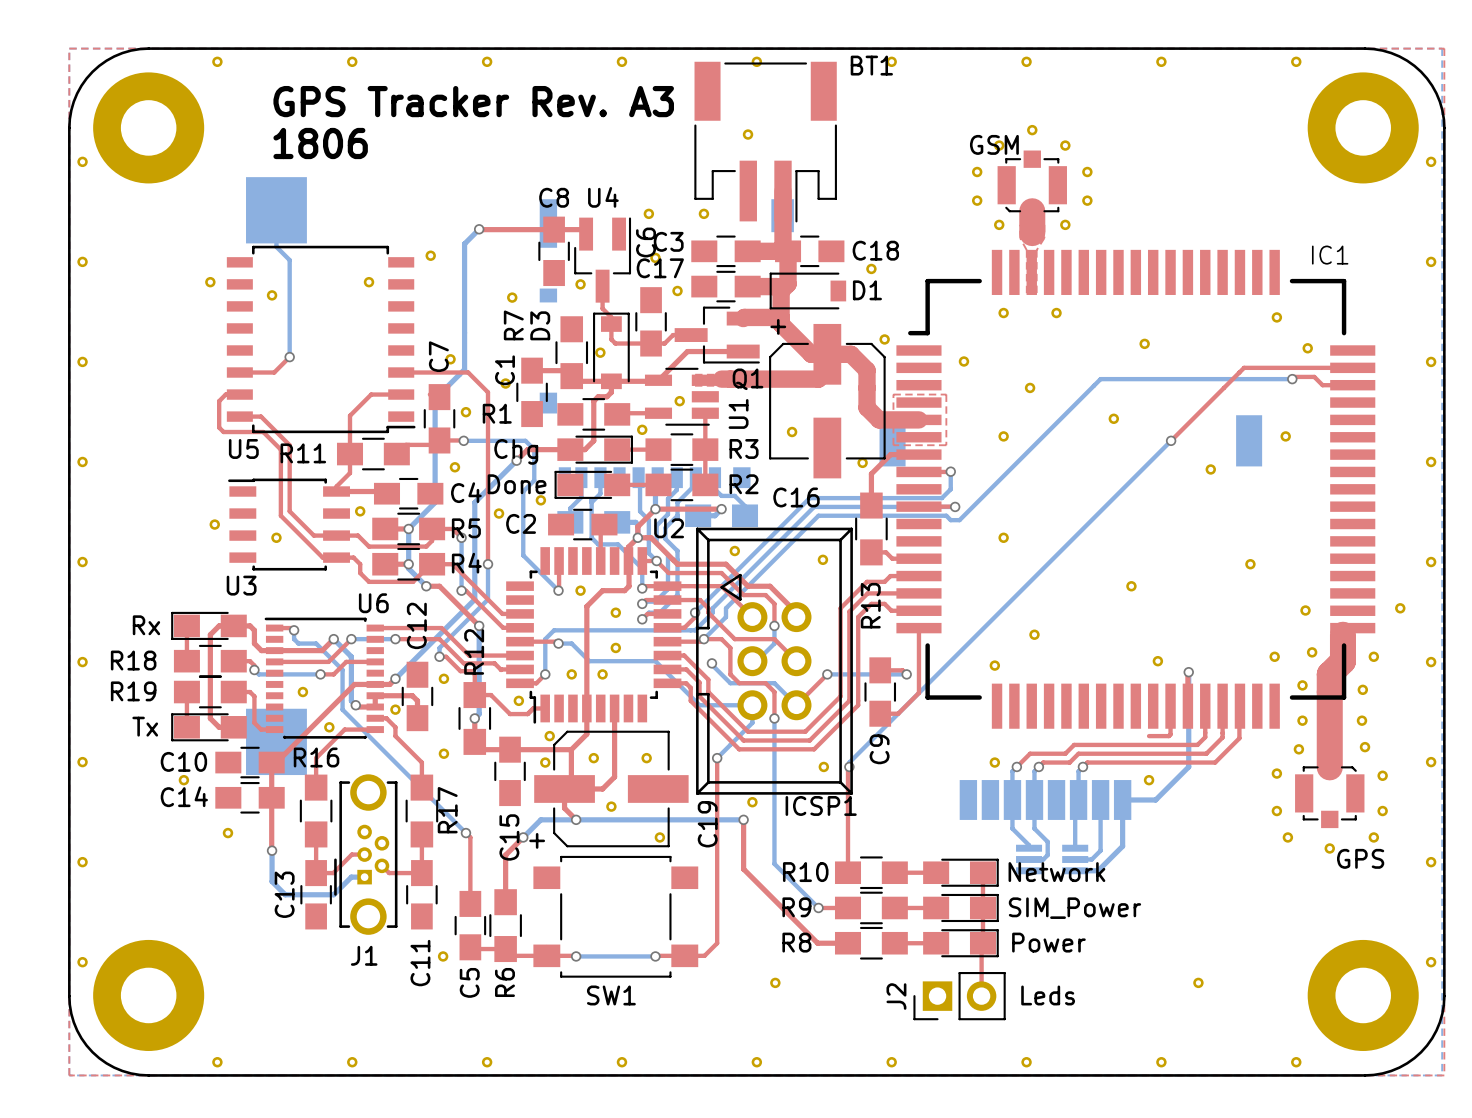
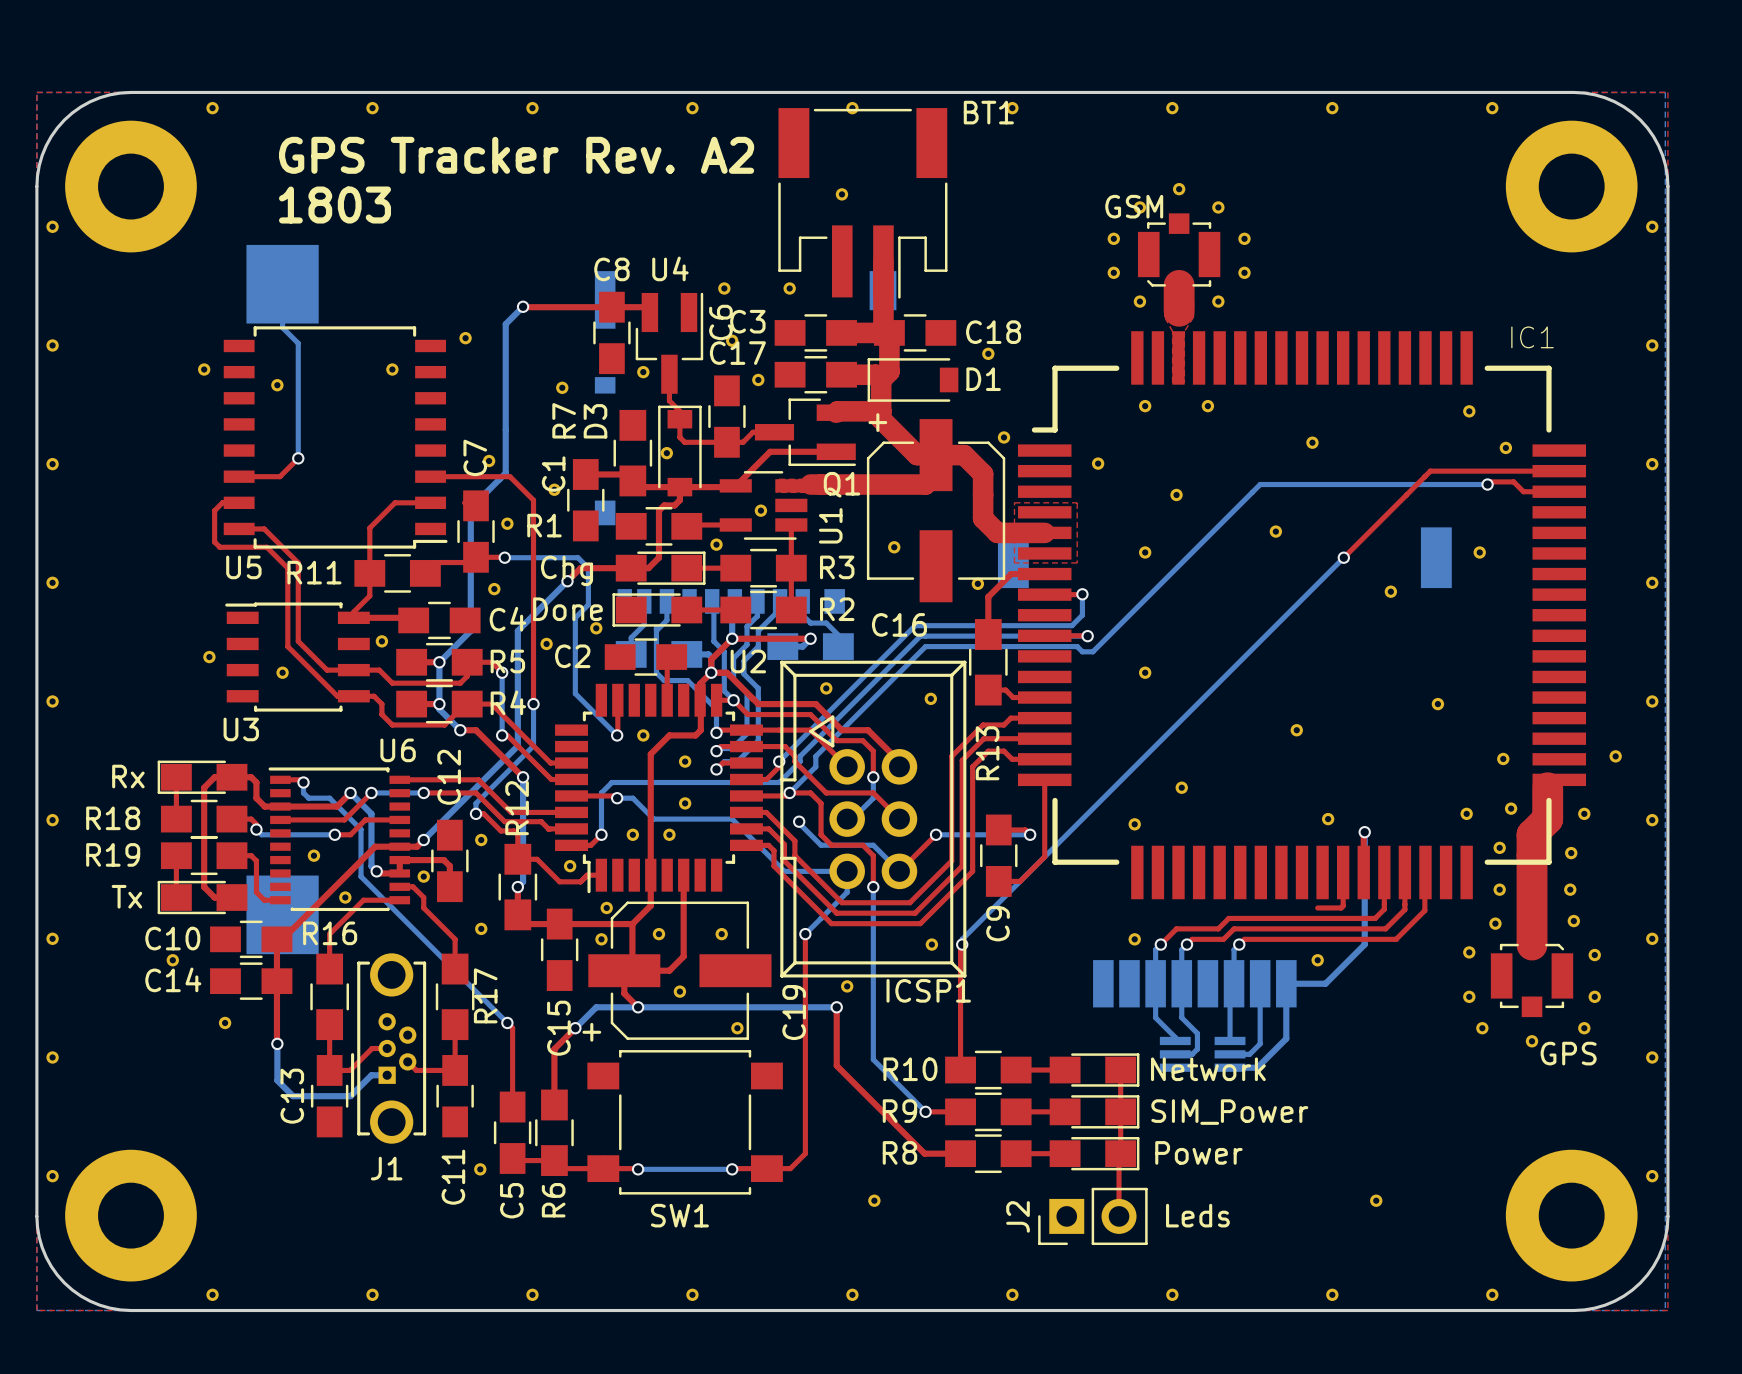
text: GPS Tracker Rev. A3 (473, 101) -> GPS Tracker Rev. A2 (516, 155)
text: 1806 (320, 143) -> 1803 (335, 205)

